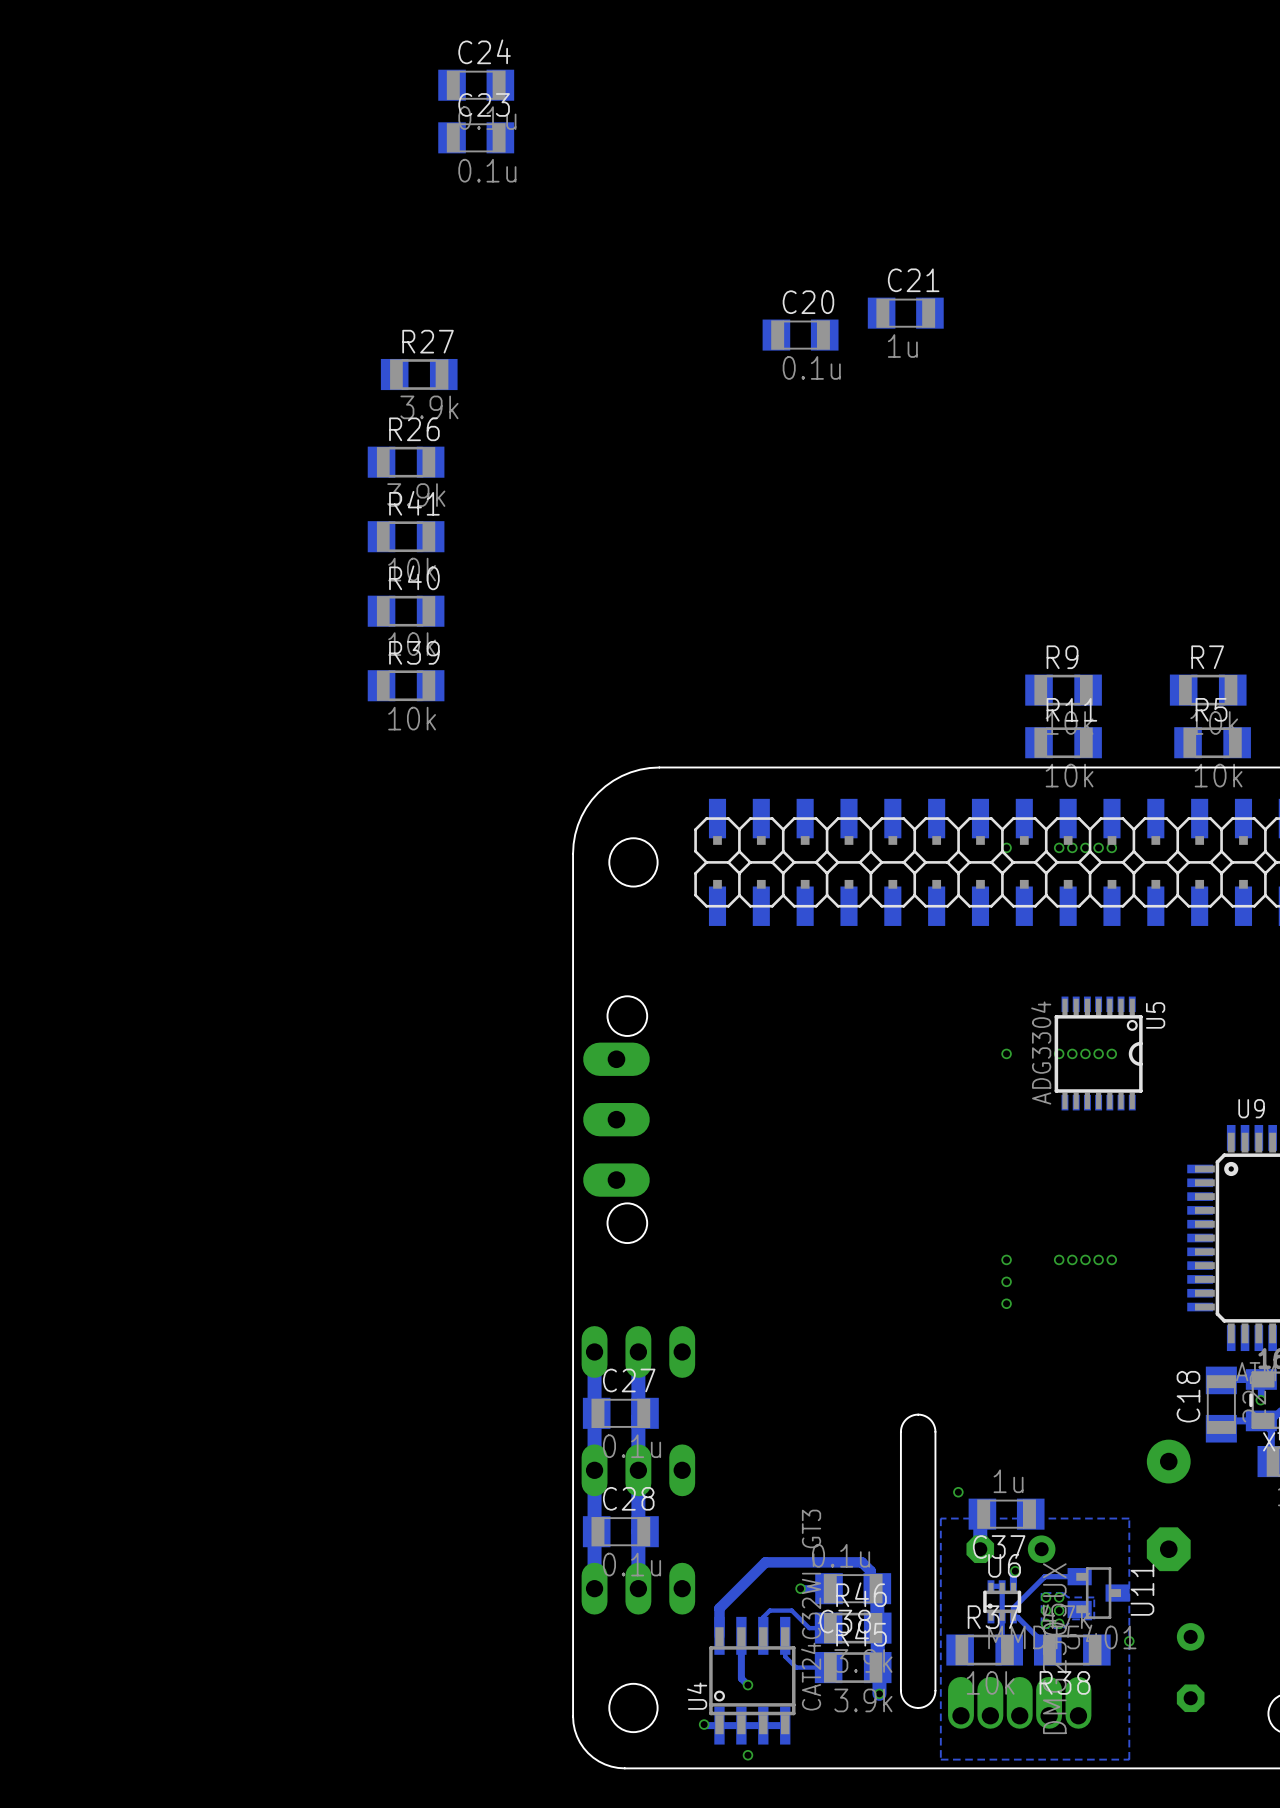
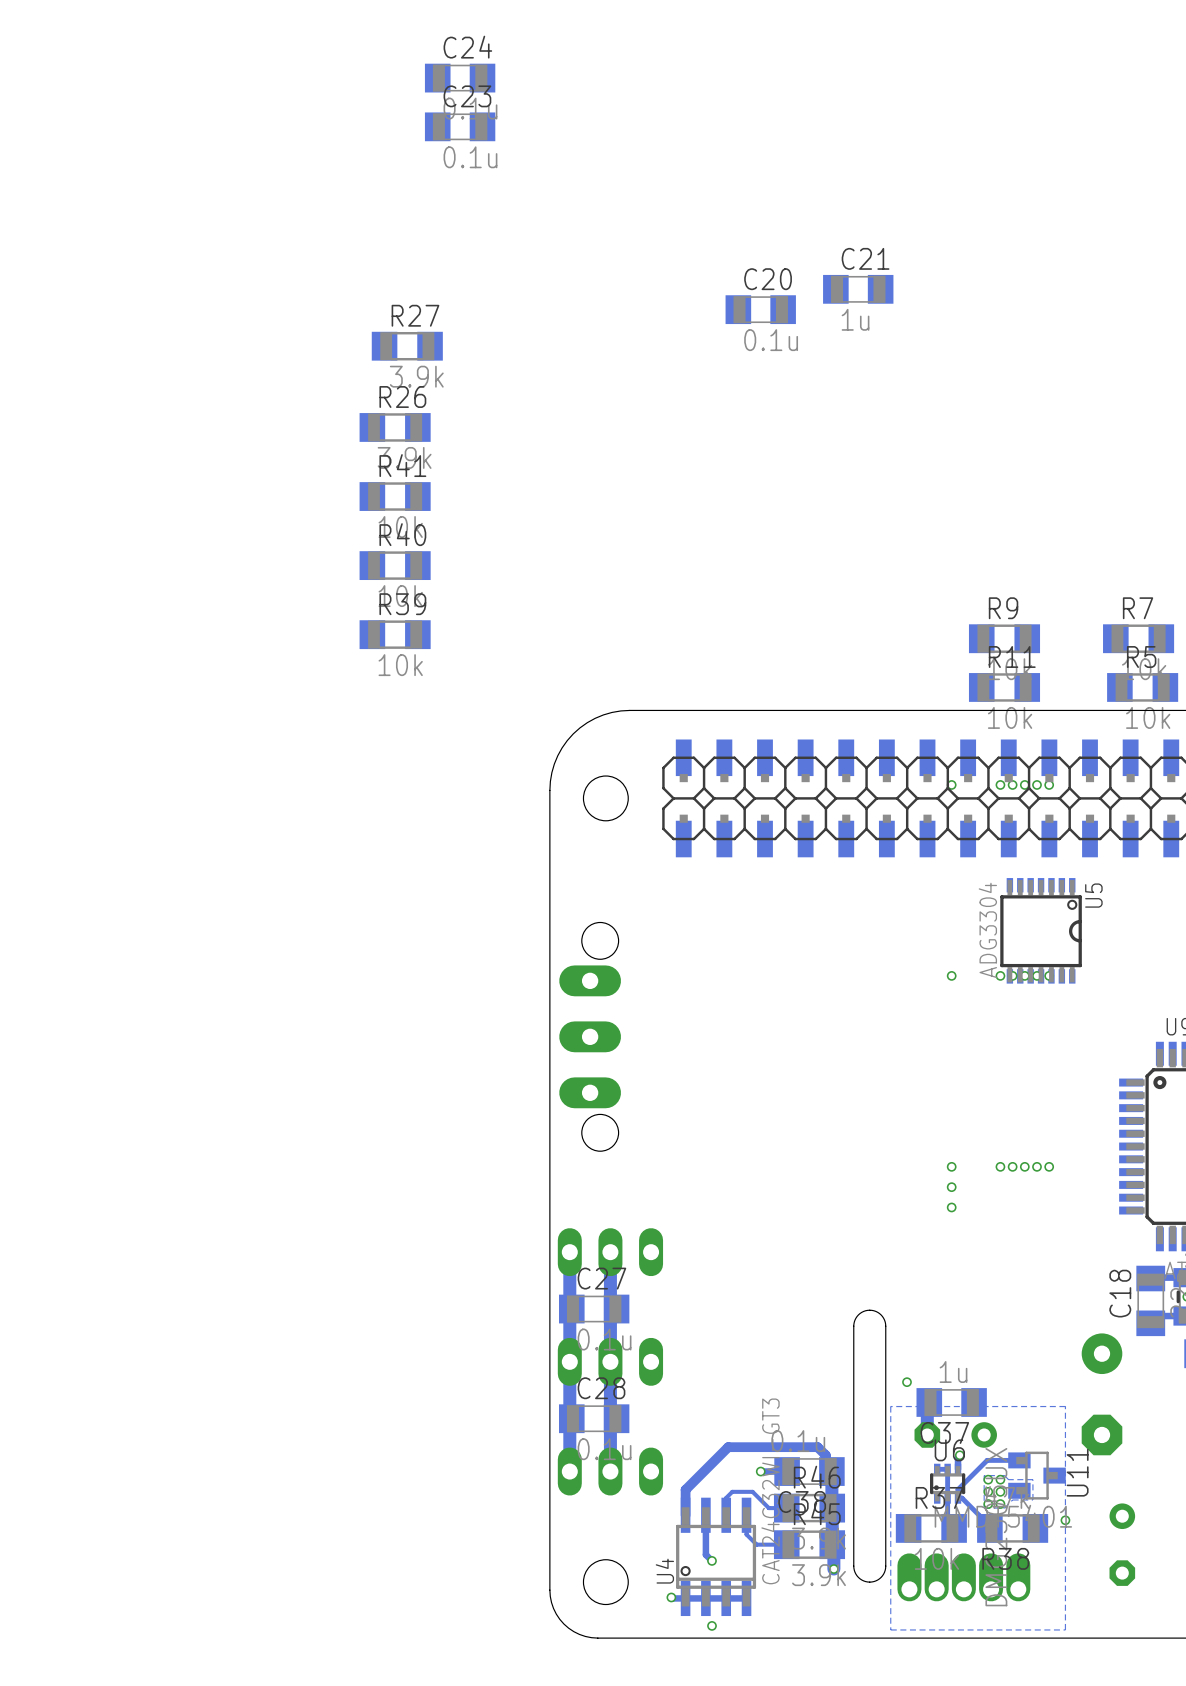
U5 position: (1098, 1053) -> (1041, 930)

